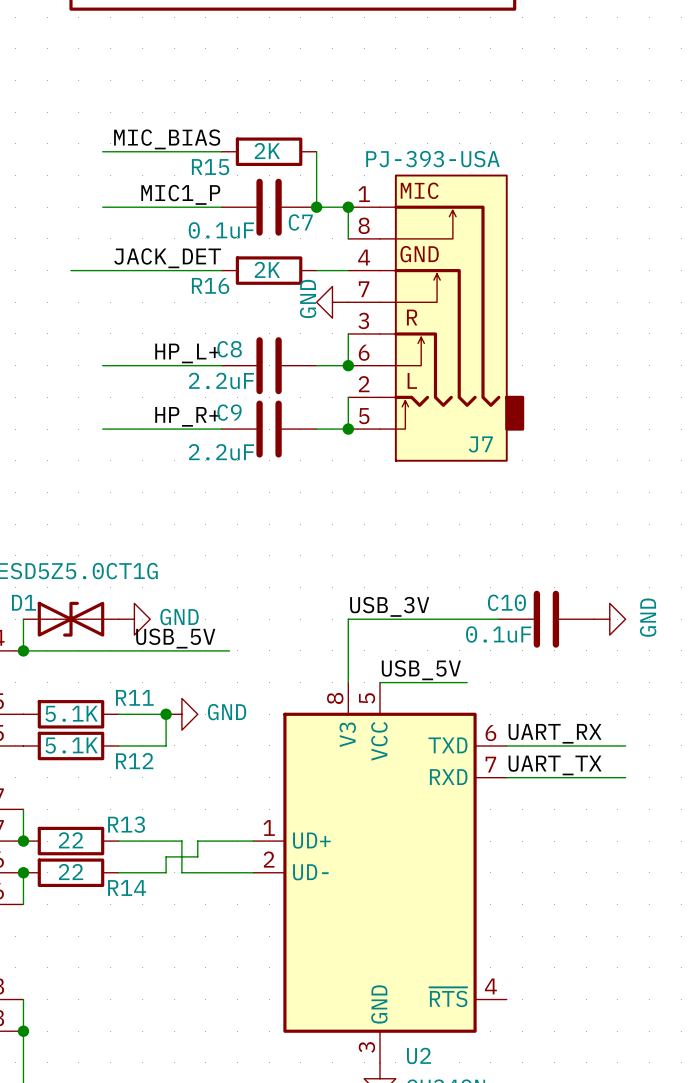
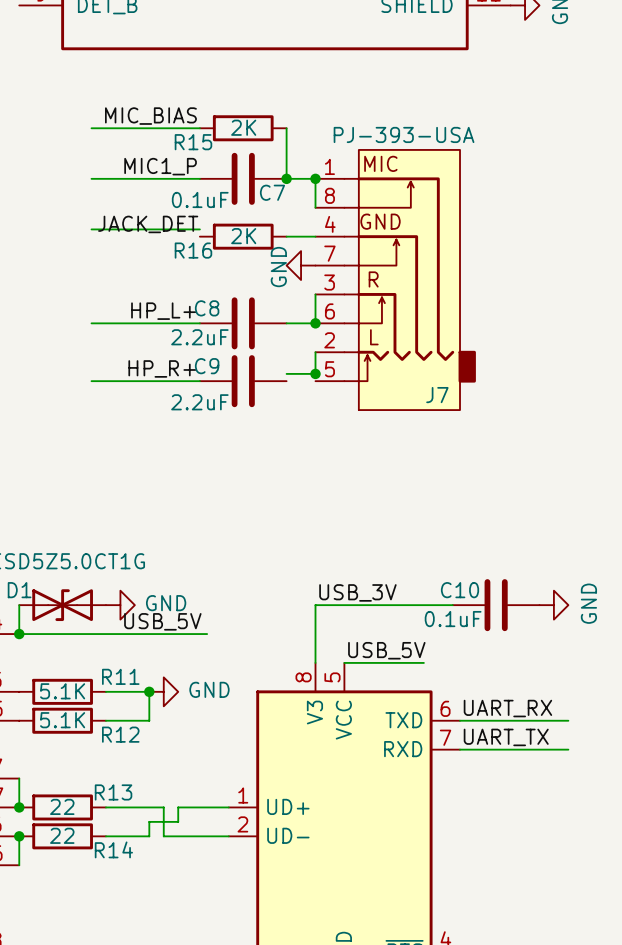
label: none -> MIC_BIAS (150, 116)
wire: none -> (91, 128) (199, 128)
label: MIC_BIAS (167, 139) -> MIC1_P (160, 166)
R15 position: (269, 151) -> (243, 128)
wire: (316, 151) (316, 207) (348, 207) (348, 238) -> (286, 128) (286, 178) (315, 178) (315, 207)
junction: none -> (286, 178)
junction: none -> (315, 178)
label: MIC1_P (180, 194) -> none
C7 position: (269, 207) -> (243, 178)
junction: (316, 207) -> none
junction: (348, 207) -> none
label position: JACK_DET (167, 258) -> JACK_DET (148, 224)
wire: (70, 270) (221, 270) -> none
R16 position: (269, 270) -> (243, 236)
wire: (316, 270) (348, 270) -> (286, 236) (315, 236)
power symbol position: GND (332, 302) -> GND (301, 265)
junction: none -> (315, 323)
J7 position: (436, 318) -> (395, 280)
wire: (348, 333) (348, 341) -> none
label position: HP_L+ (187, 353) -> HP_L+ (163, 311)
wire: (102, 365) (221, 365) -> (91, 323) (199, 323)
C8 position: (269, 365) -> (243, 323)
wire: (348, 397) (348, 429) (316, 429) -> (315, 294) (315, 323) (286, 323)
label position: HP_R+ (187, 416) -> HP_R+ (162, 368)
wire: (102, 429) (221, 429) -> (91, 381) (199, 381)
C9 position: (269, 429) -> (243, 381)
junction: (348, 429) -> none

